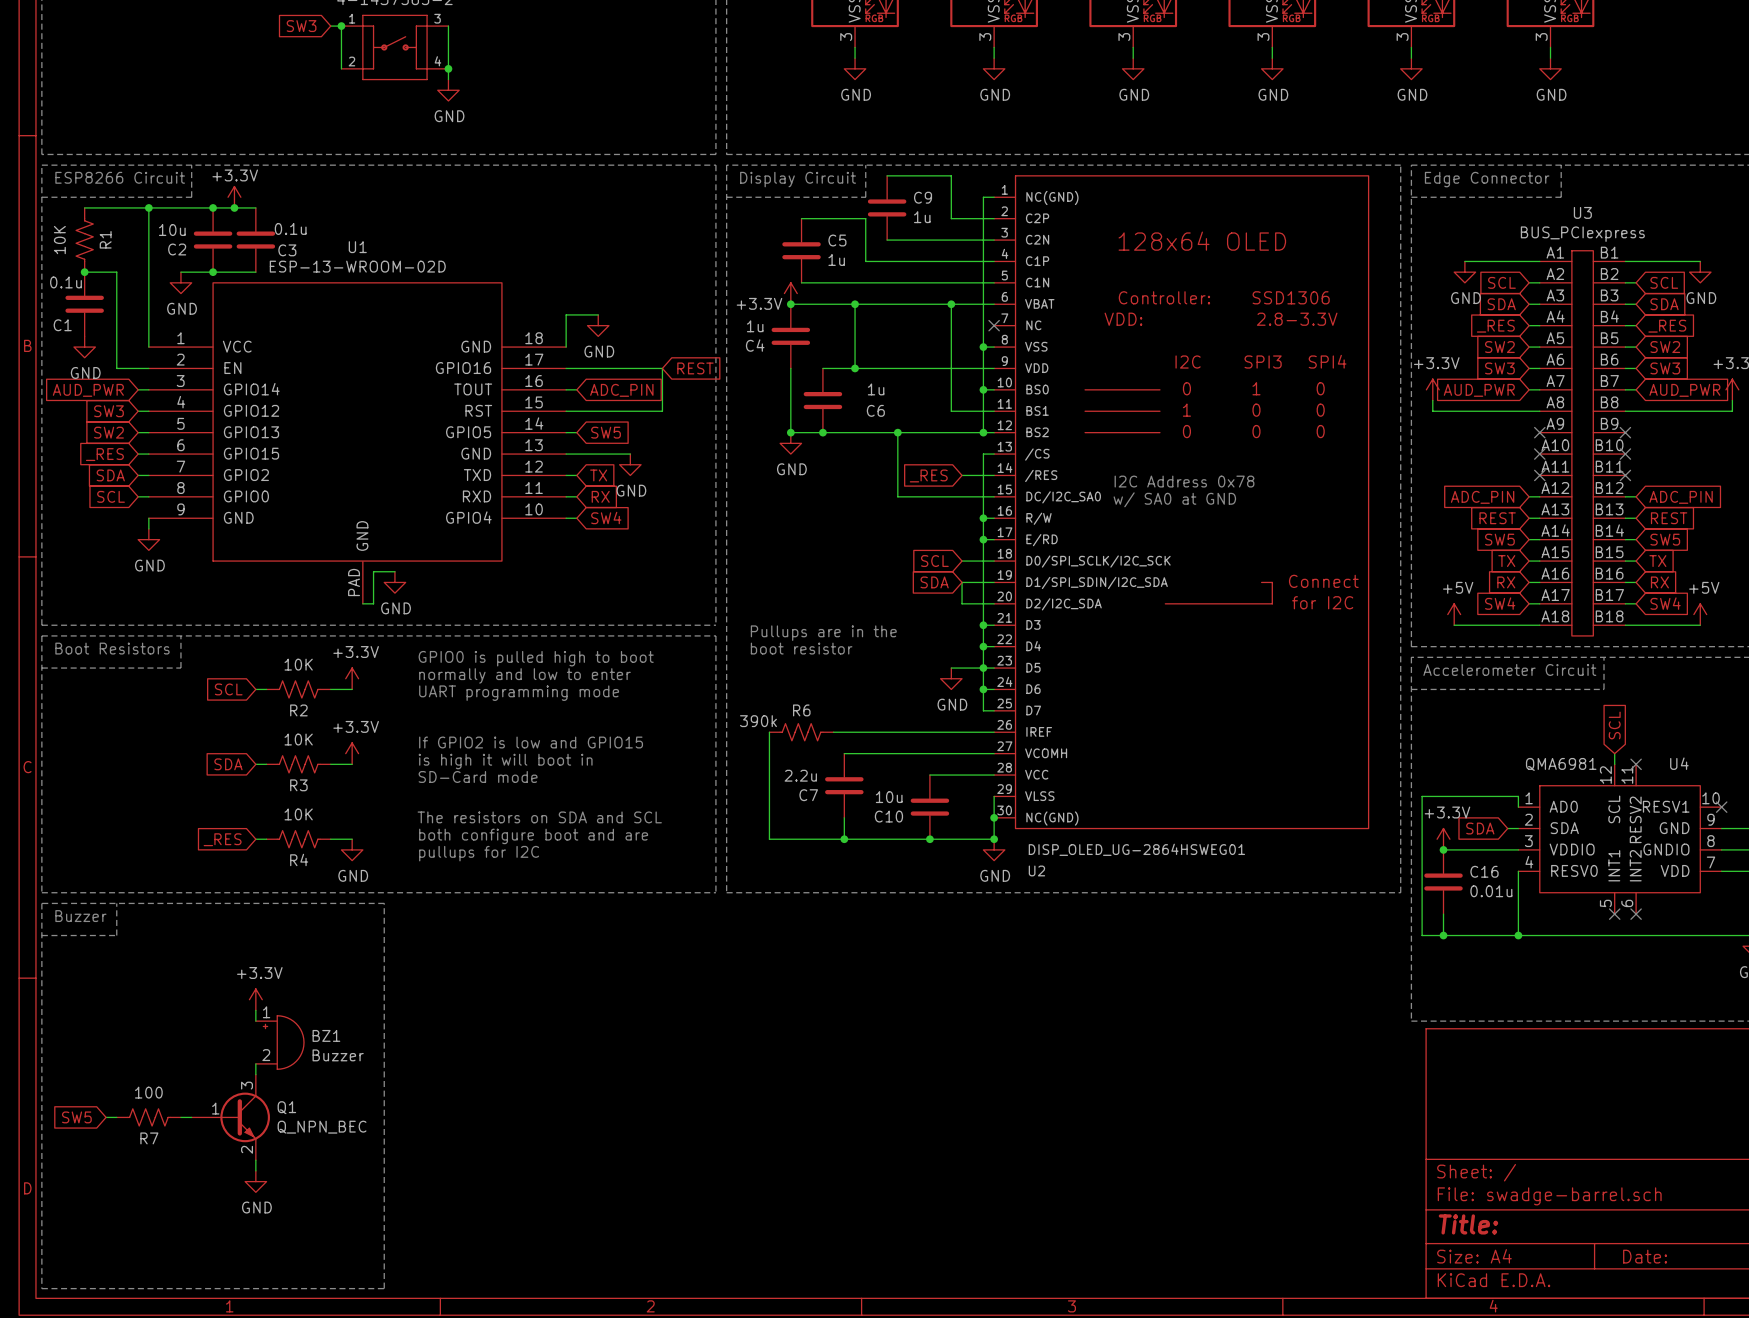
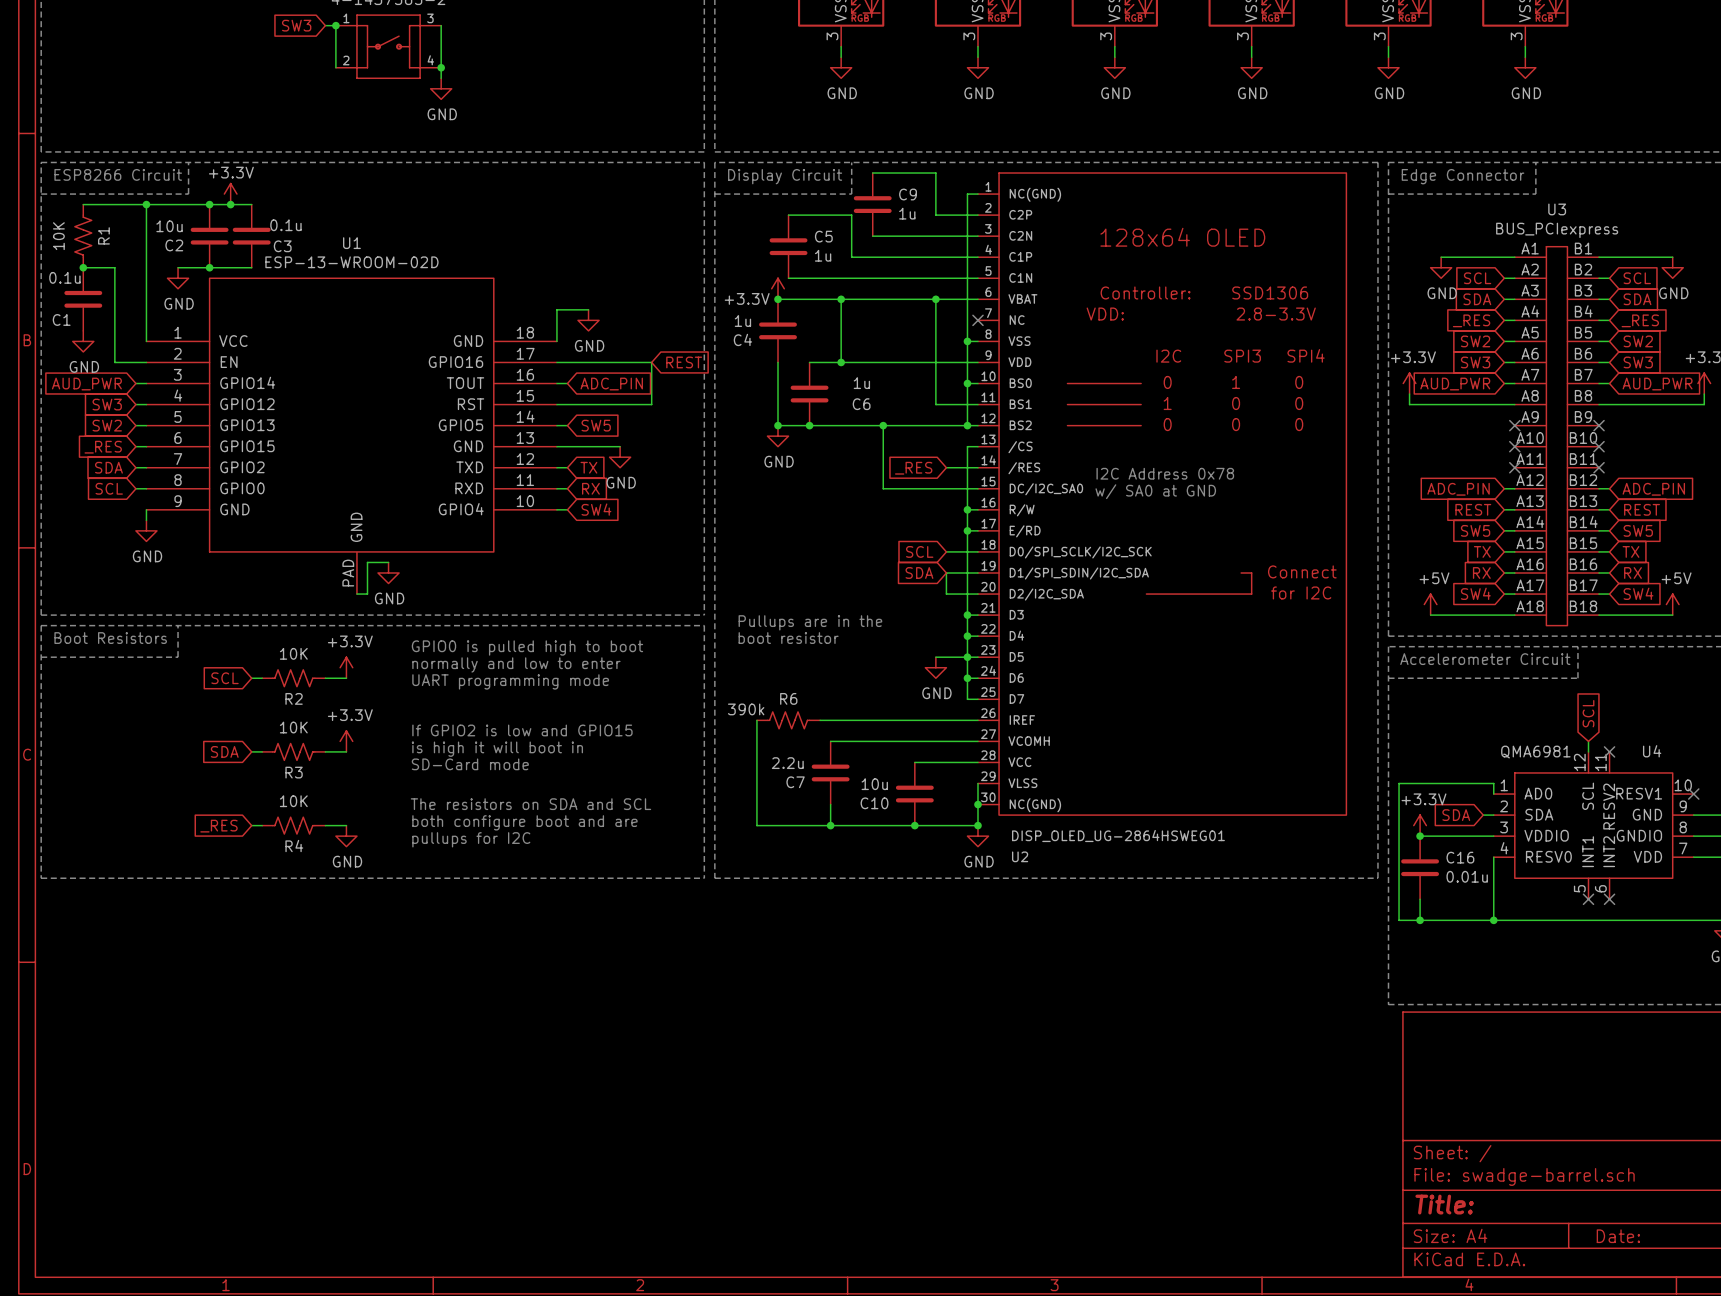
line: (41, 903) (41, 1288) (384, 1288) (384, 903) (41, 903) -> none
line: (116, 903) (116, 935) (41, 935) -> none
text: Buzzer (80, 916) -> none
power symbol: +3.3V (255, 999) -> none
wire: (255, 1010) (255, 1021) -> none
BZ1: Buzzer (279, 1042) -> none
wire: (255, 1063) (255, 1074) -> none
global label: SW5 (76, 1117) -> none
wire: (106, 1117) (116, 1117) -> none
R7: 100 (148, 1117) -> none
wire: (180, 1117) (191, 1117) -> none
Q1: Q_NPN_BEC (230, 1117) -> none
wire: (255, 1160) (255, 1170) -> none
power symbol: GND (255, 1181) -> none

